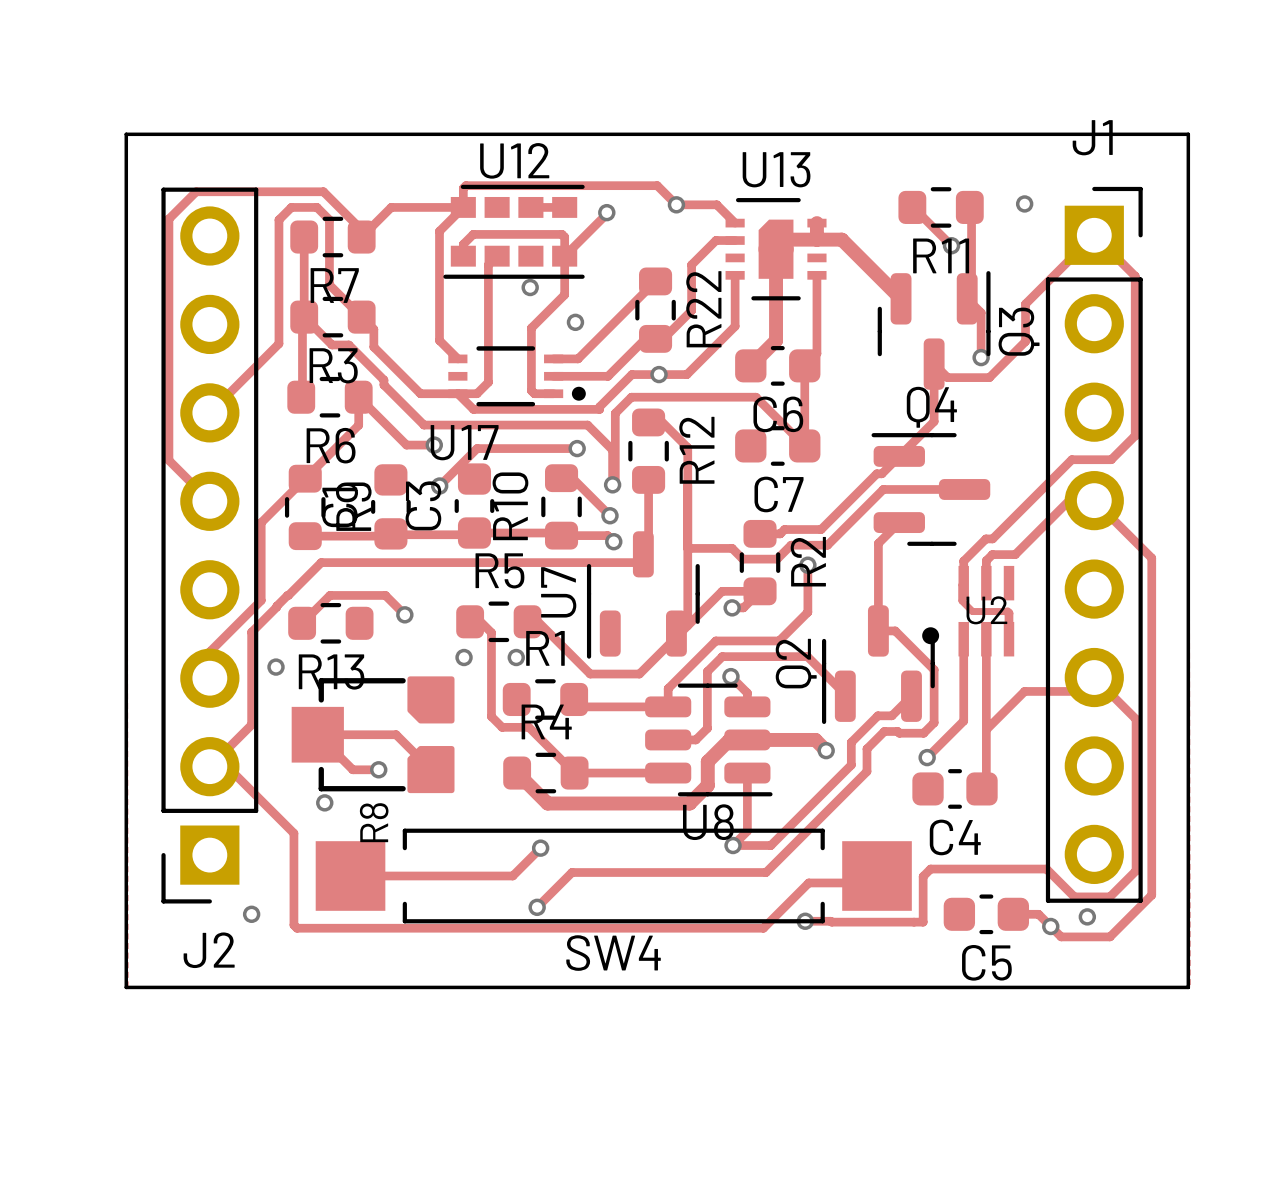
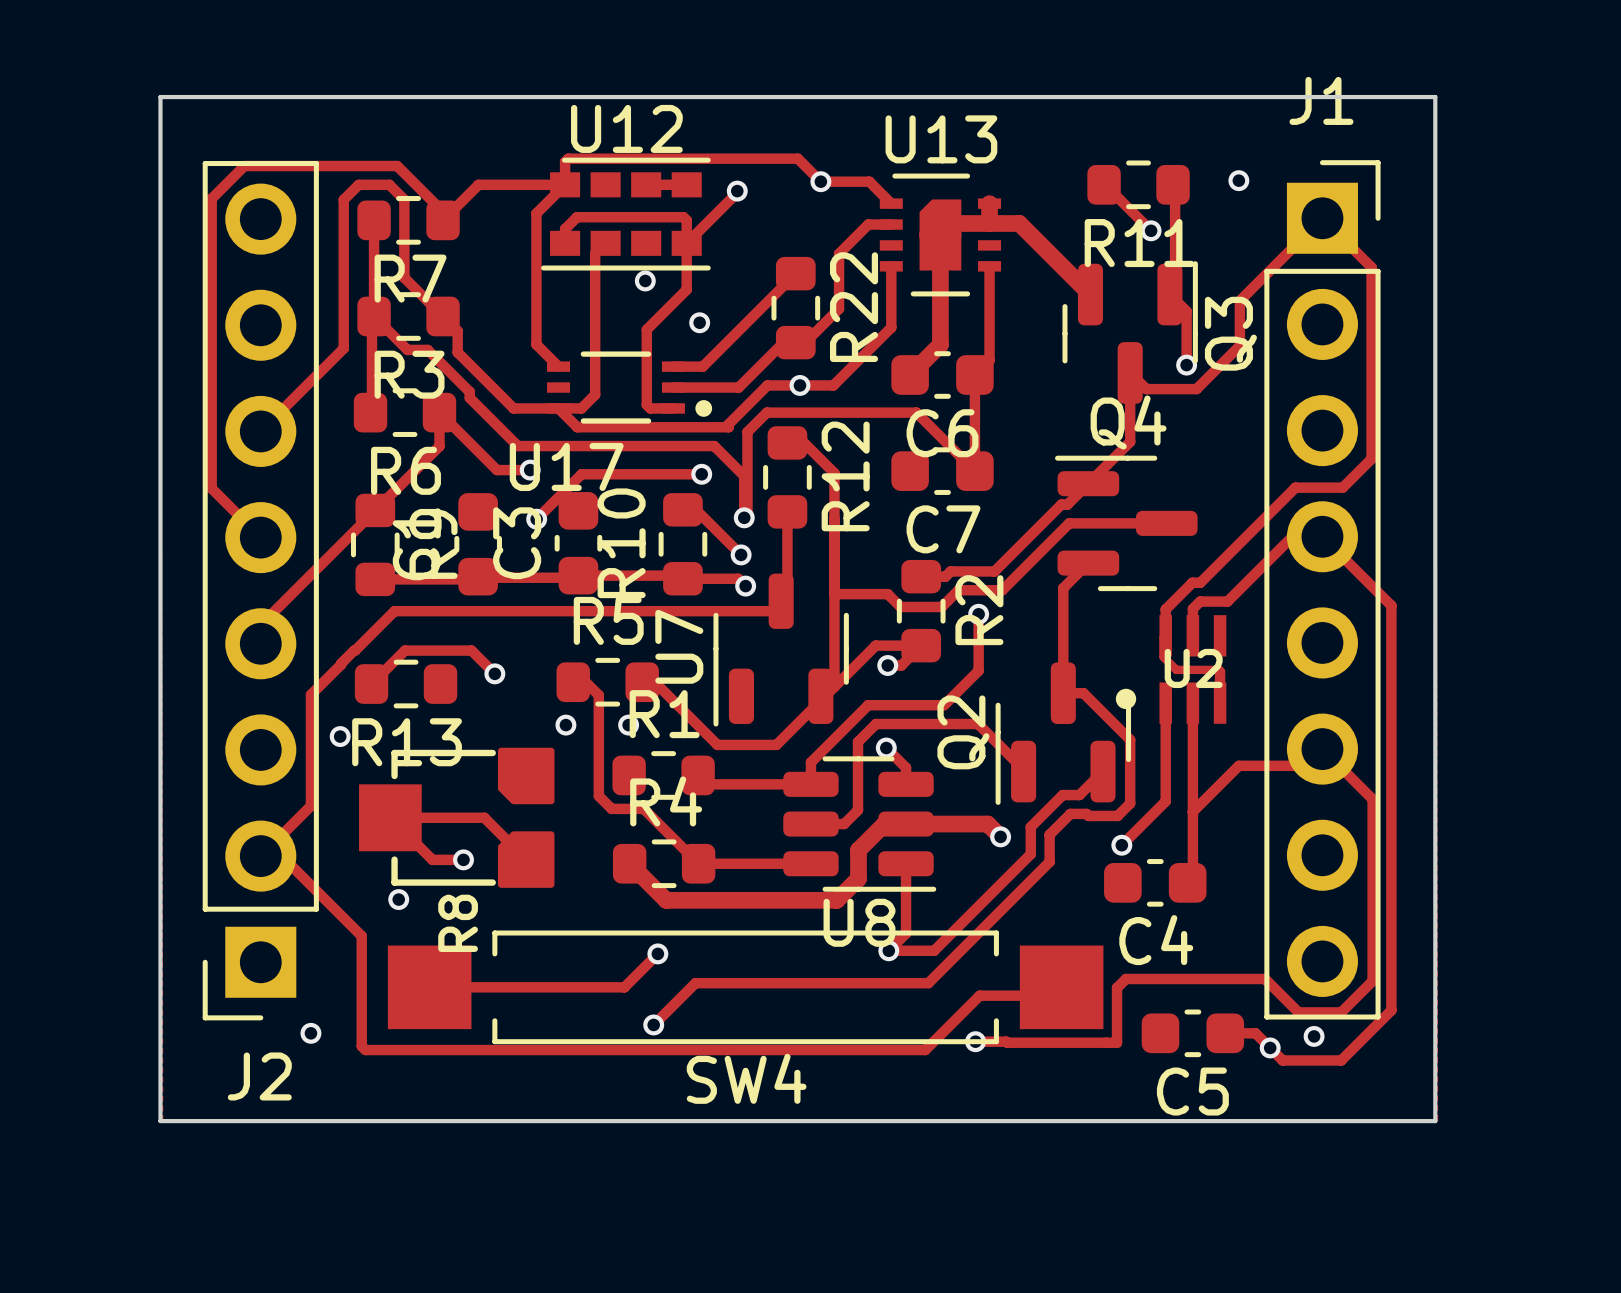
track: (261, 522) (261, 600) (209, 651) (209, 678) -> (322, 563) (260, 624)

